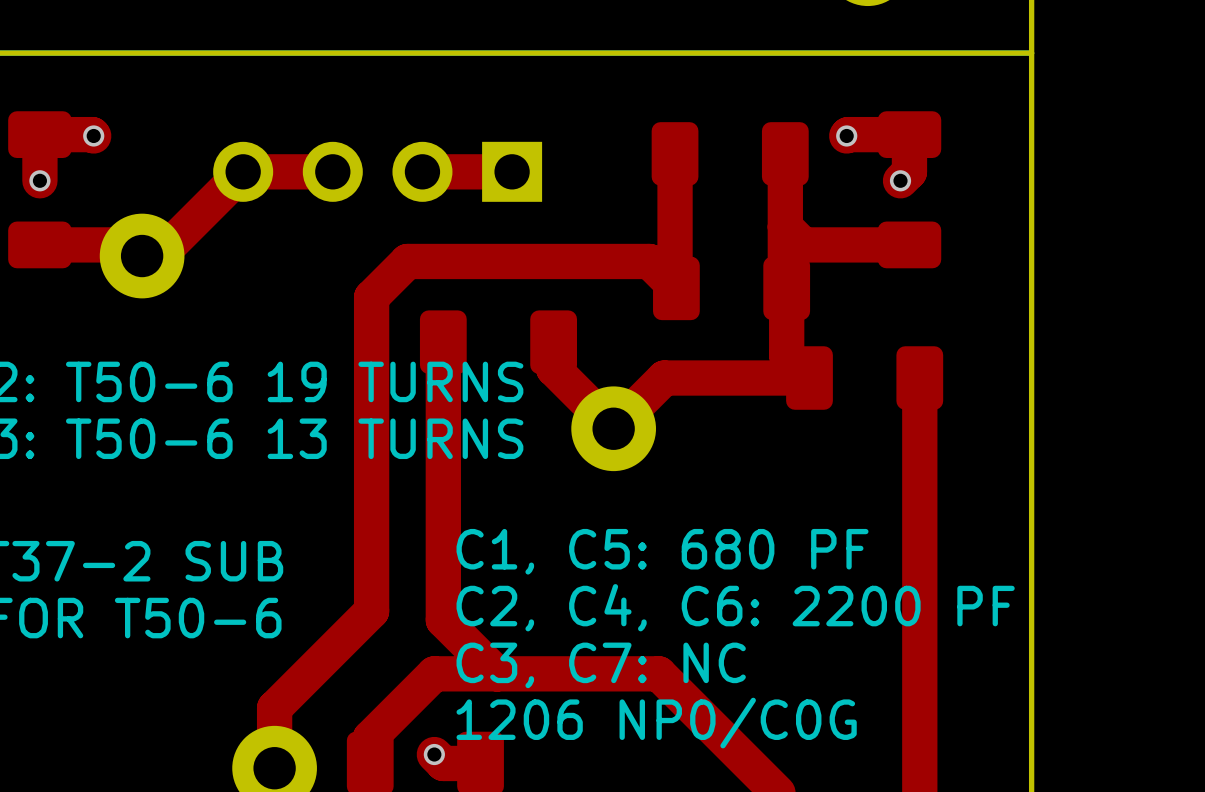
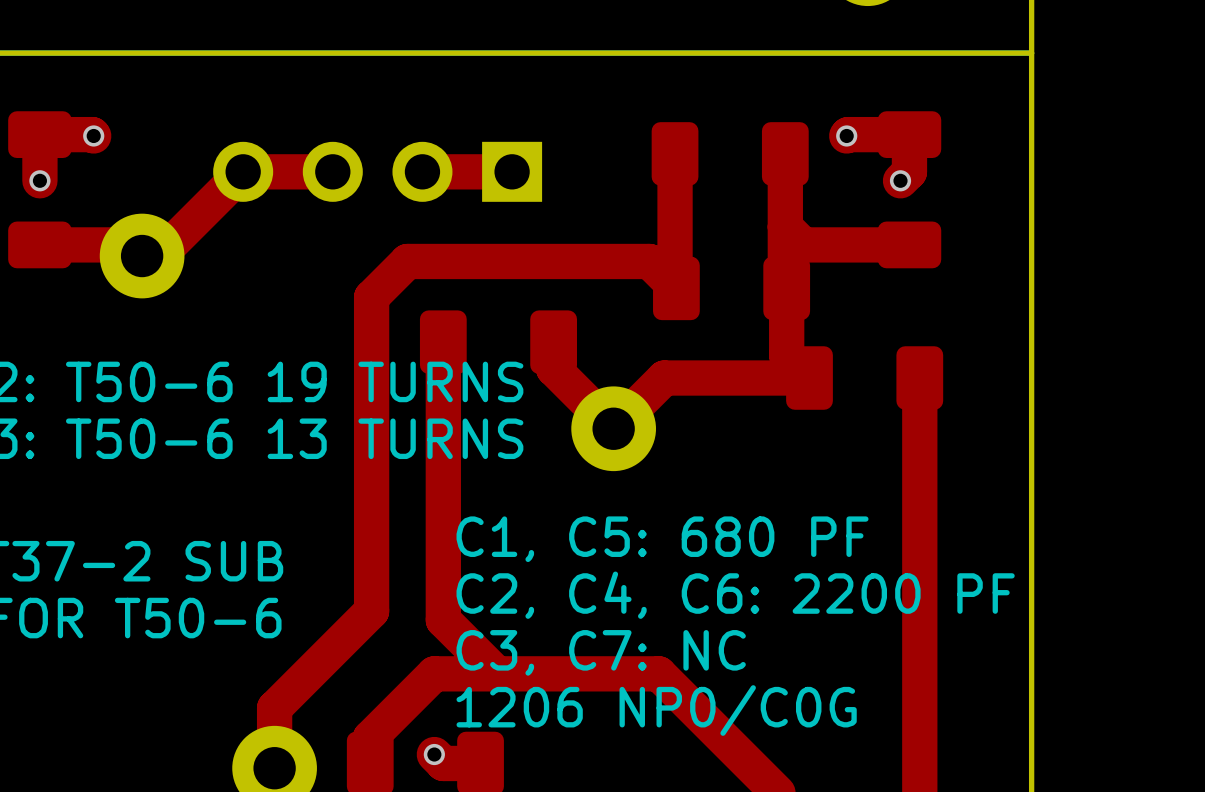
text position: C1, C5: 680 PF (662, 551) -> C1, C5: 680 PF (662, 539)
text position: C2, C4, C6: 2200 PF (735, 607) -> C2, C4, C6: 2200 PF (735, 595)
text position: C3, C7: NC (601, 665) -> C3, C7: NC (601, 652)
text position: 1206 NP0/C0G (656, 723) -> 1206 NP0/C0G (656, 710)

